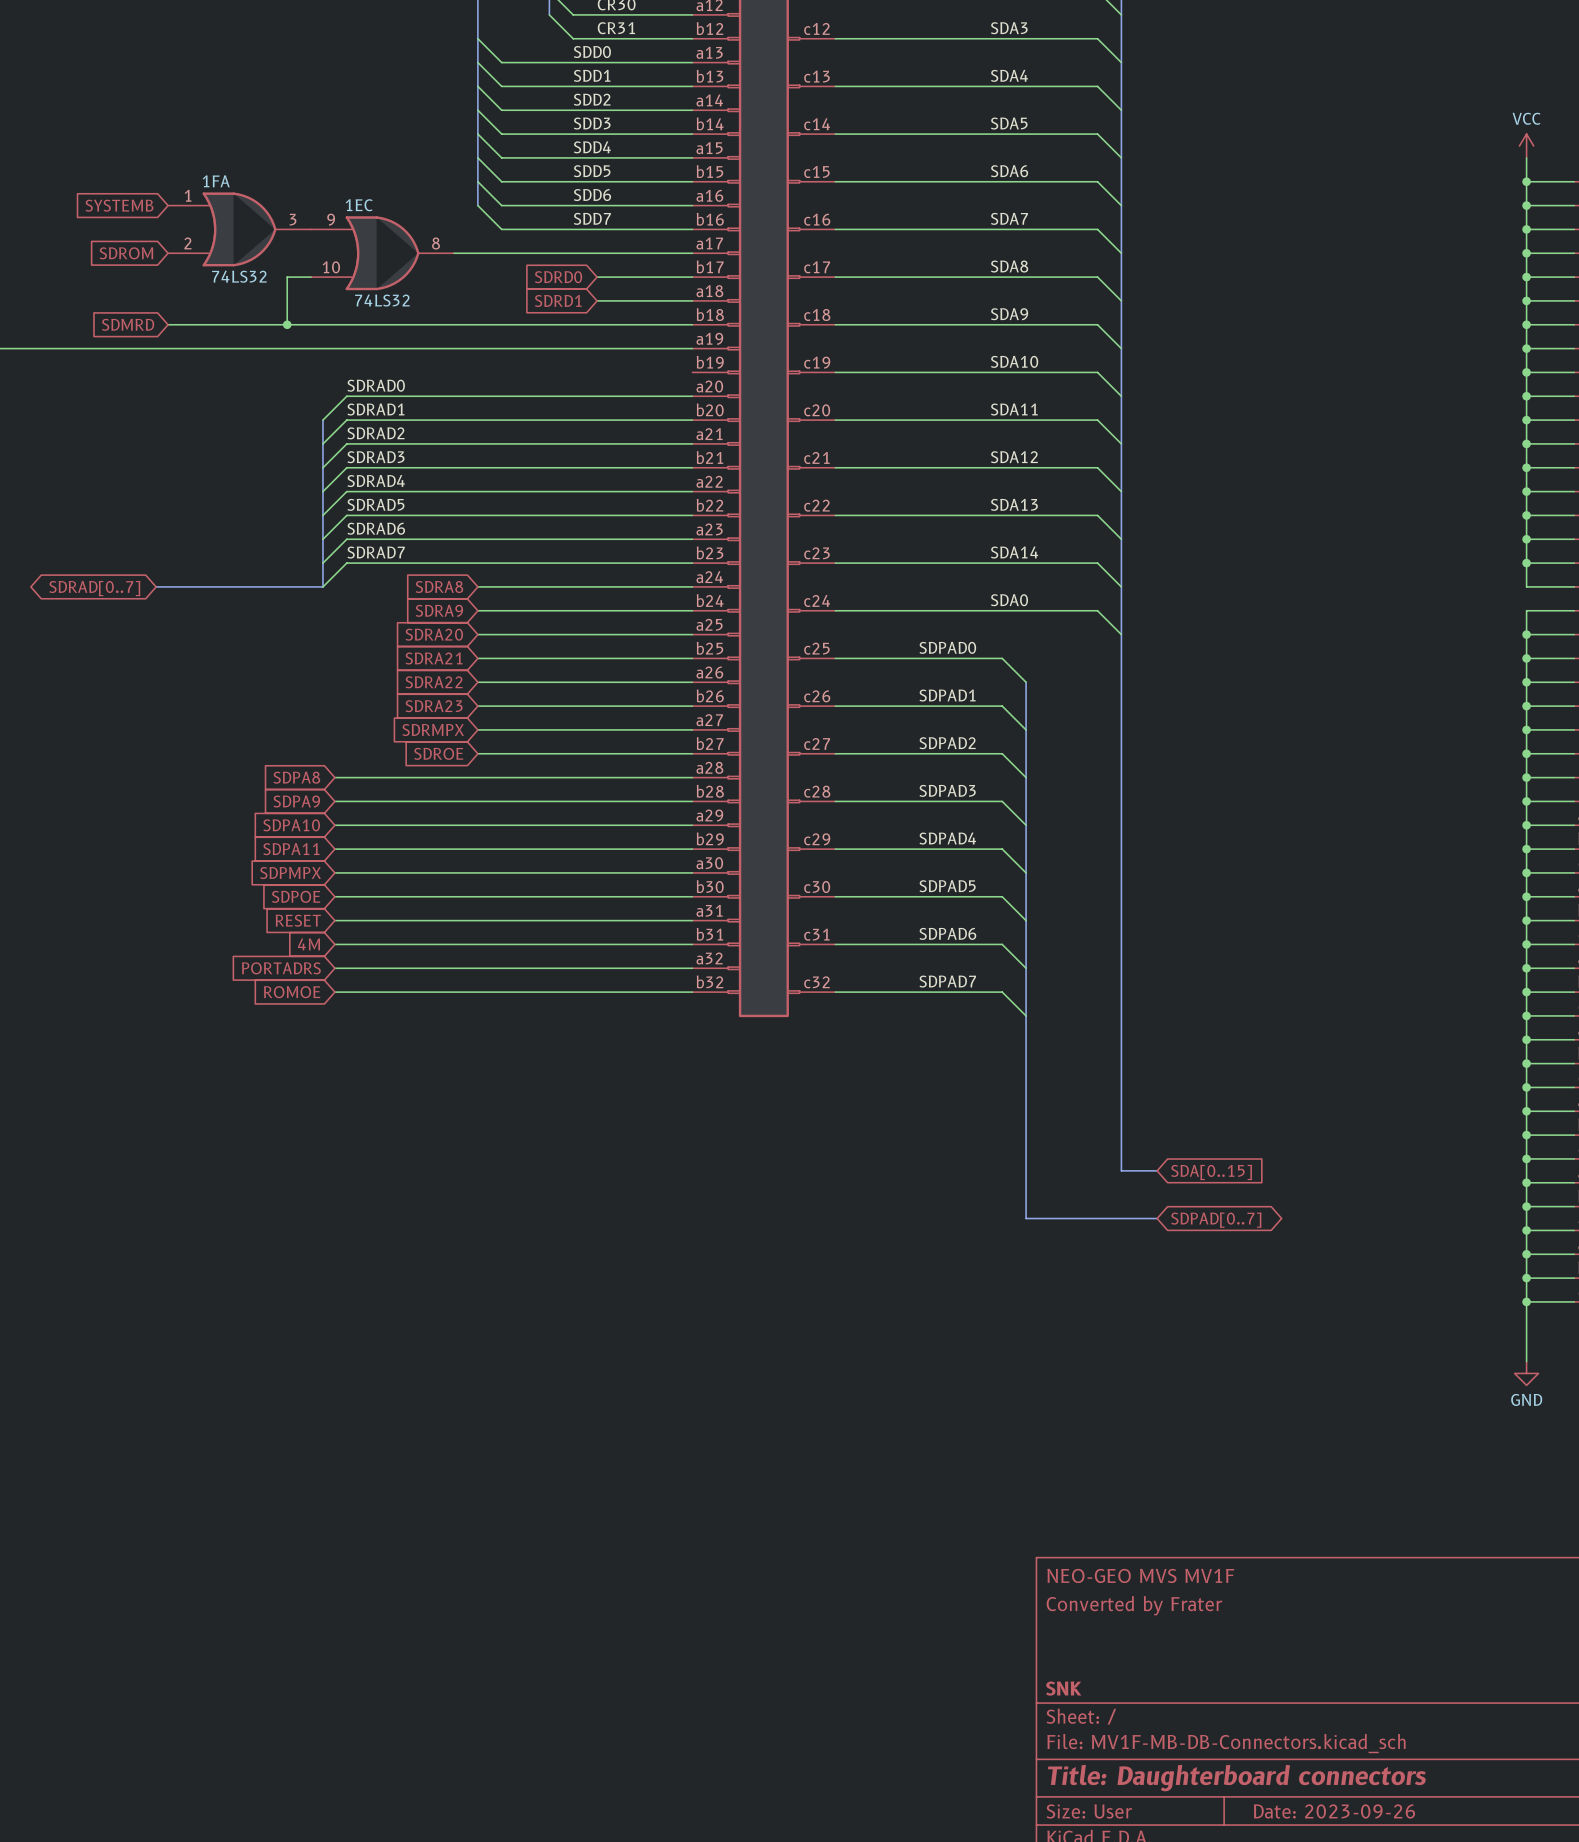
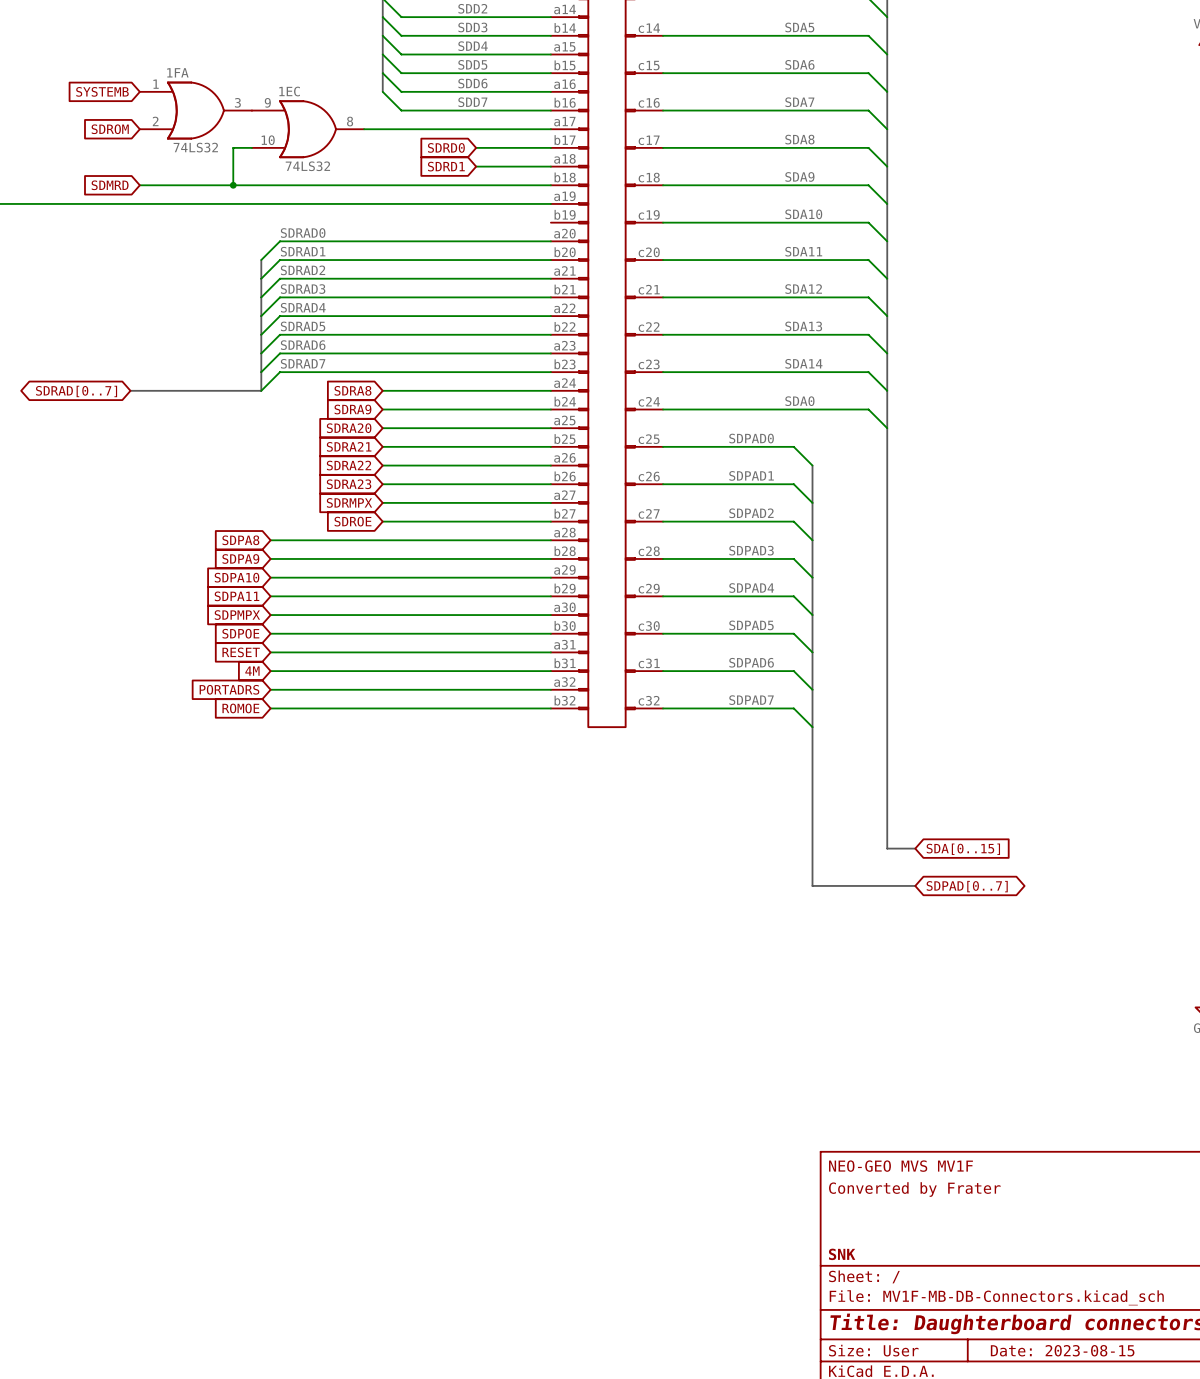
title block: Date: 2023-09-26 (1334, 1811) -> Date: 2023-08-15 (1062, 1350)

